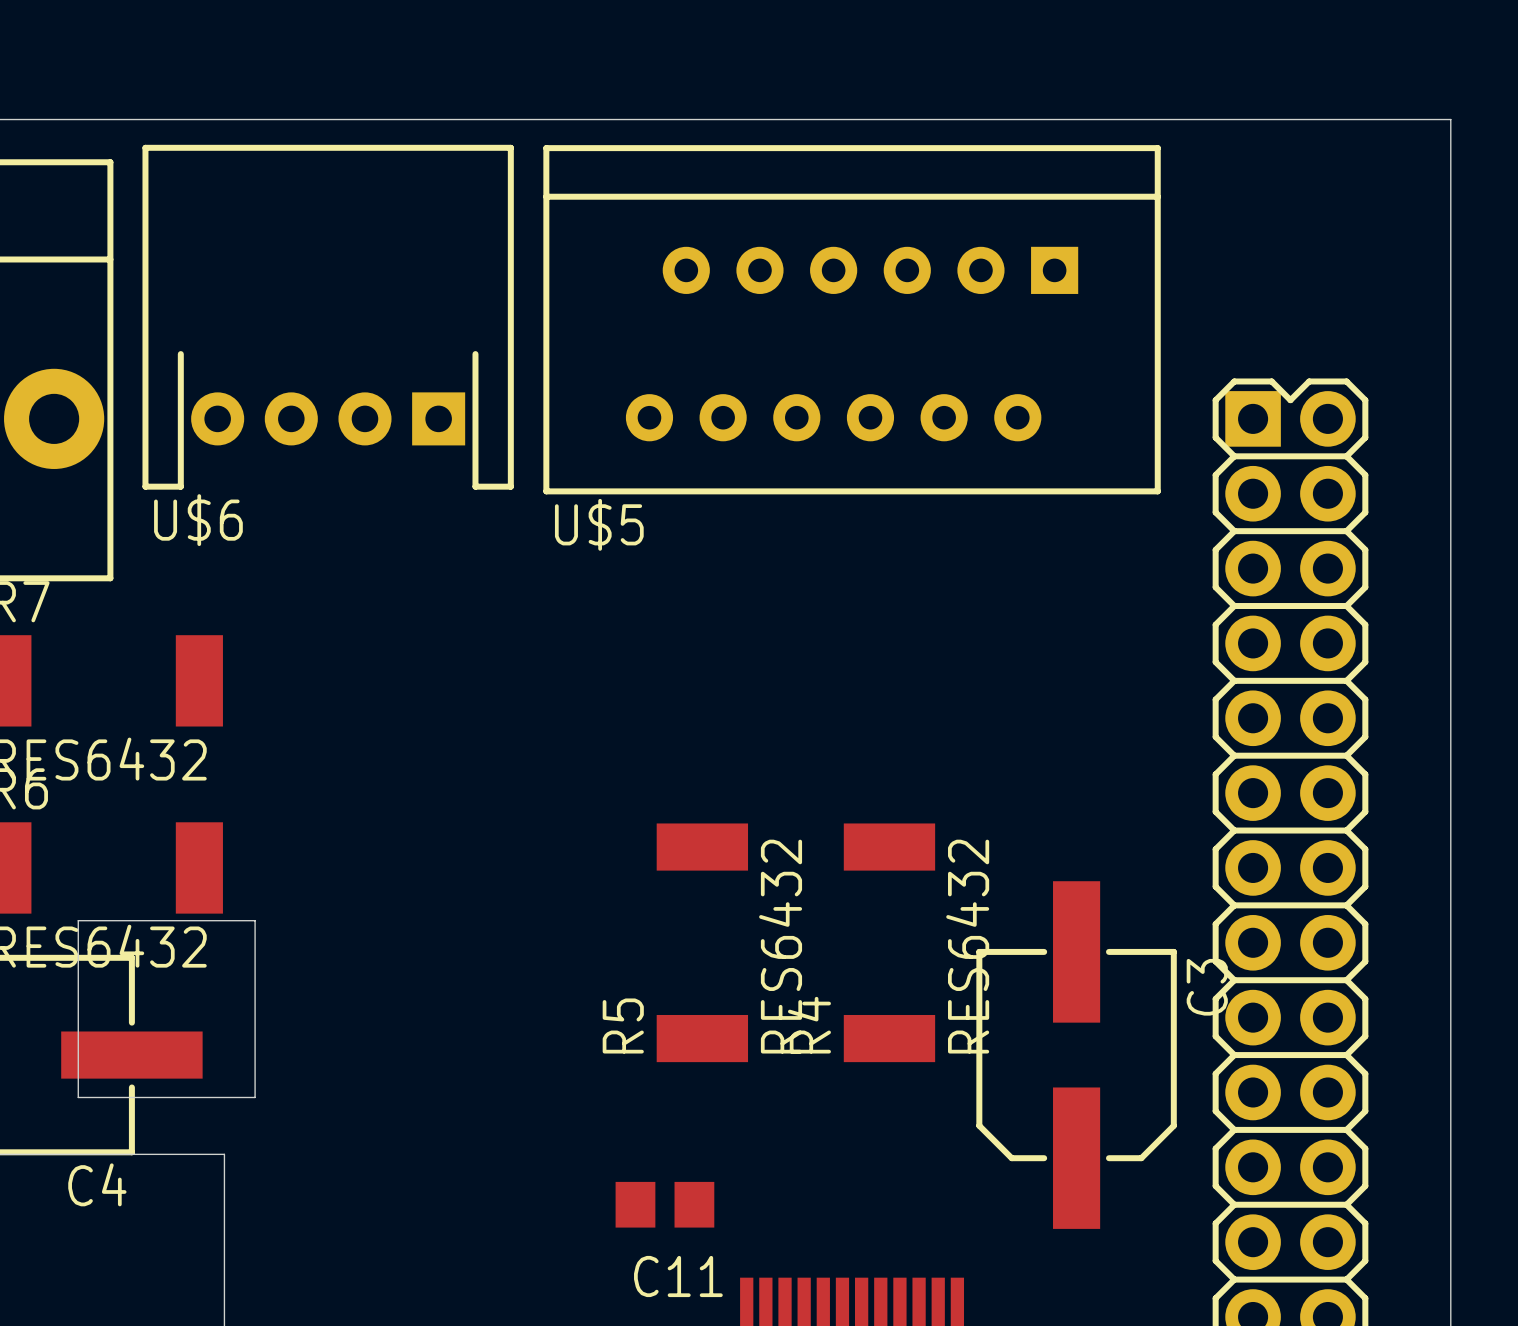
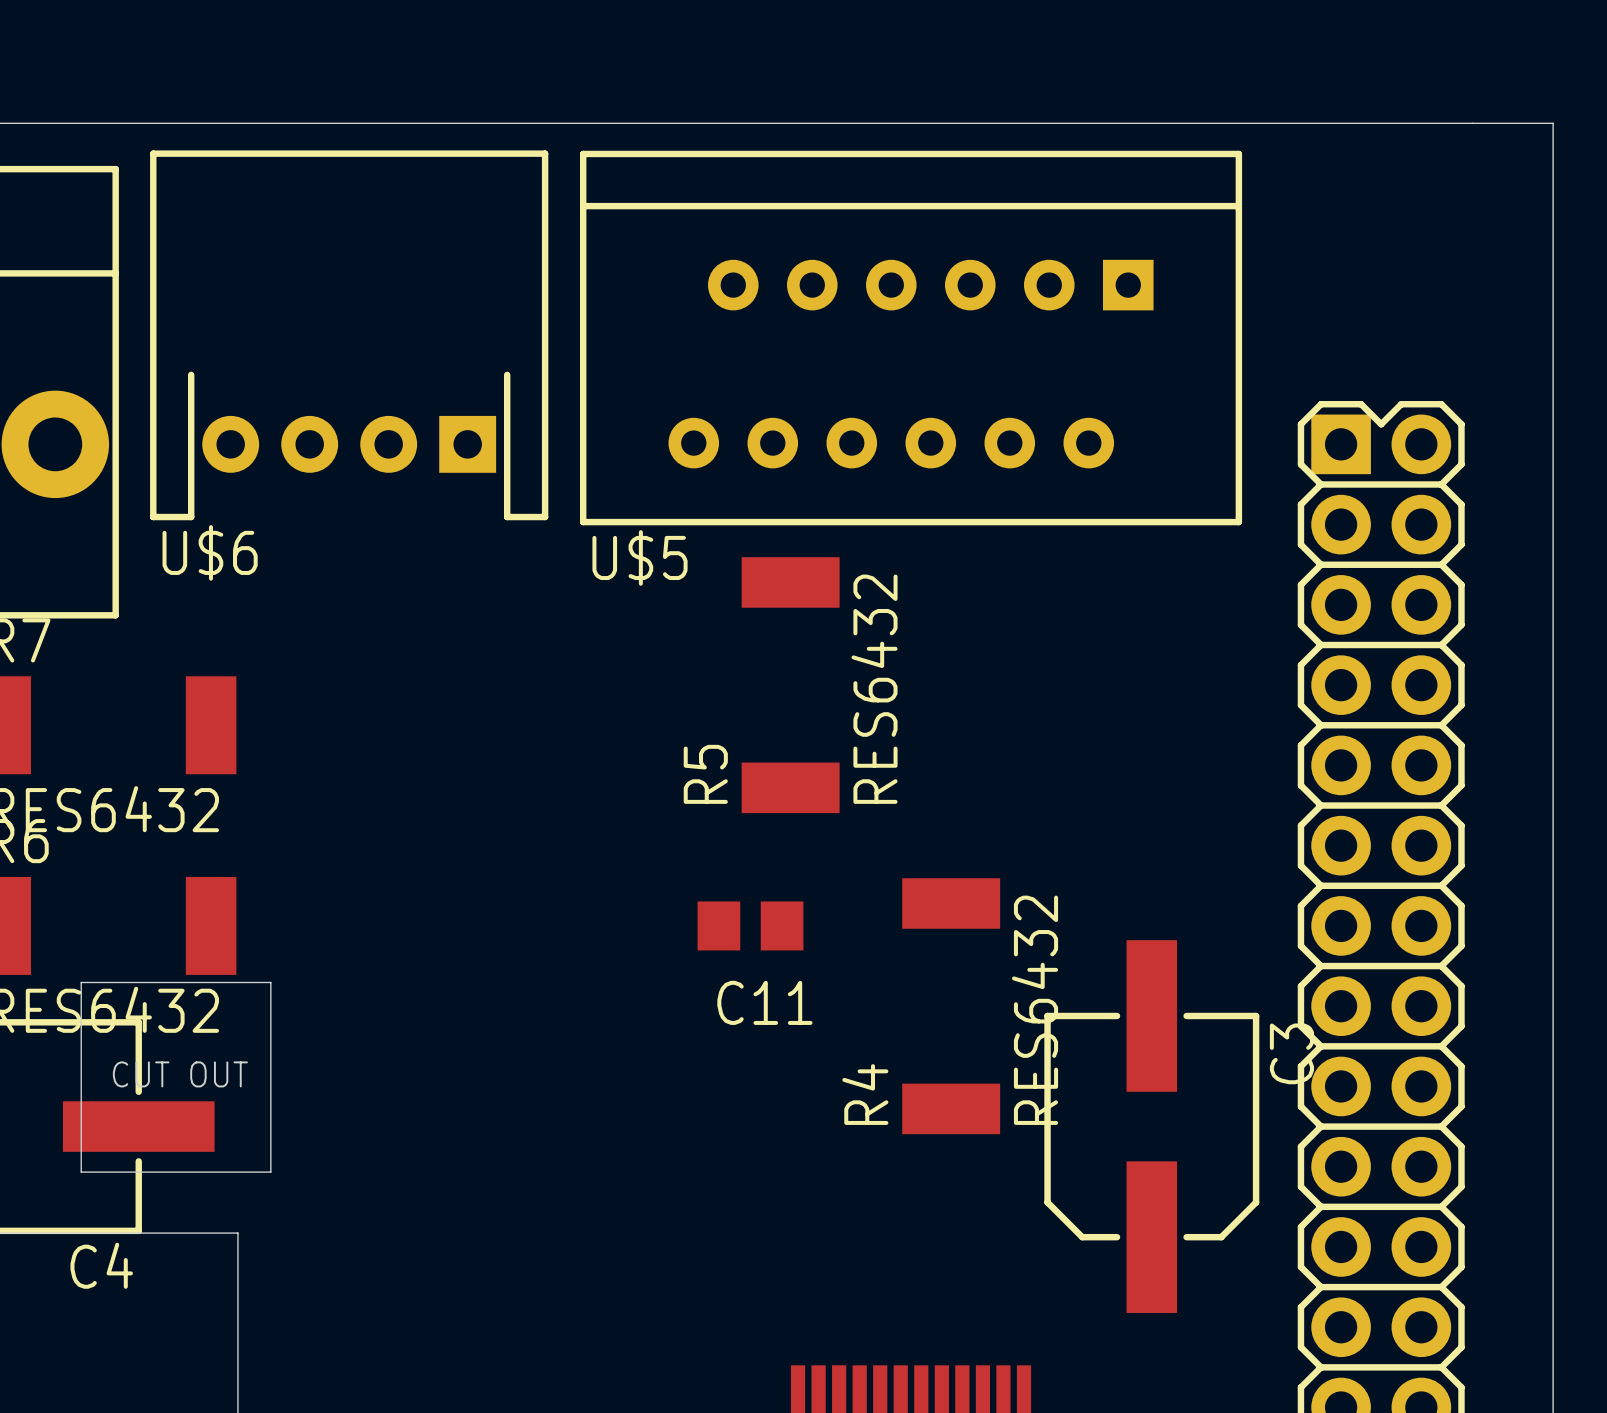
R5 position: (702, 942) -> (790, 685)
text: none -> CUT OUT (180, 1074)
C11 position: (664, 1204) -> (750, 925)

